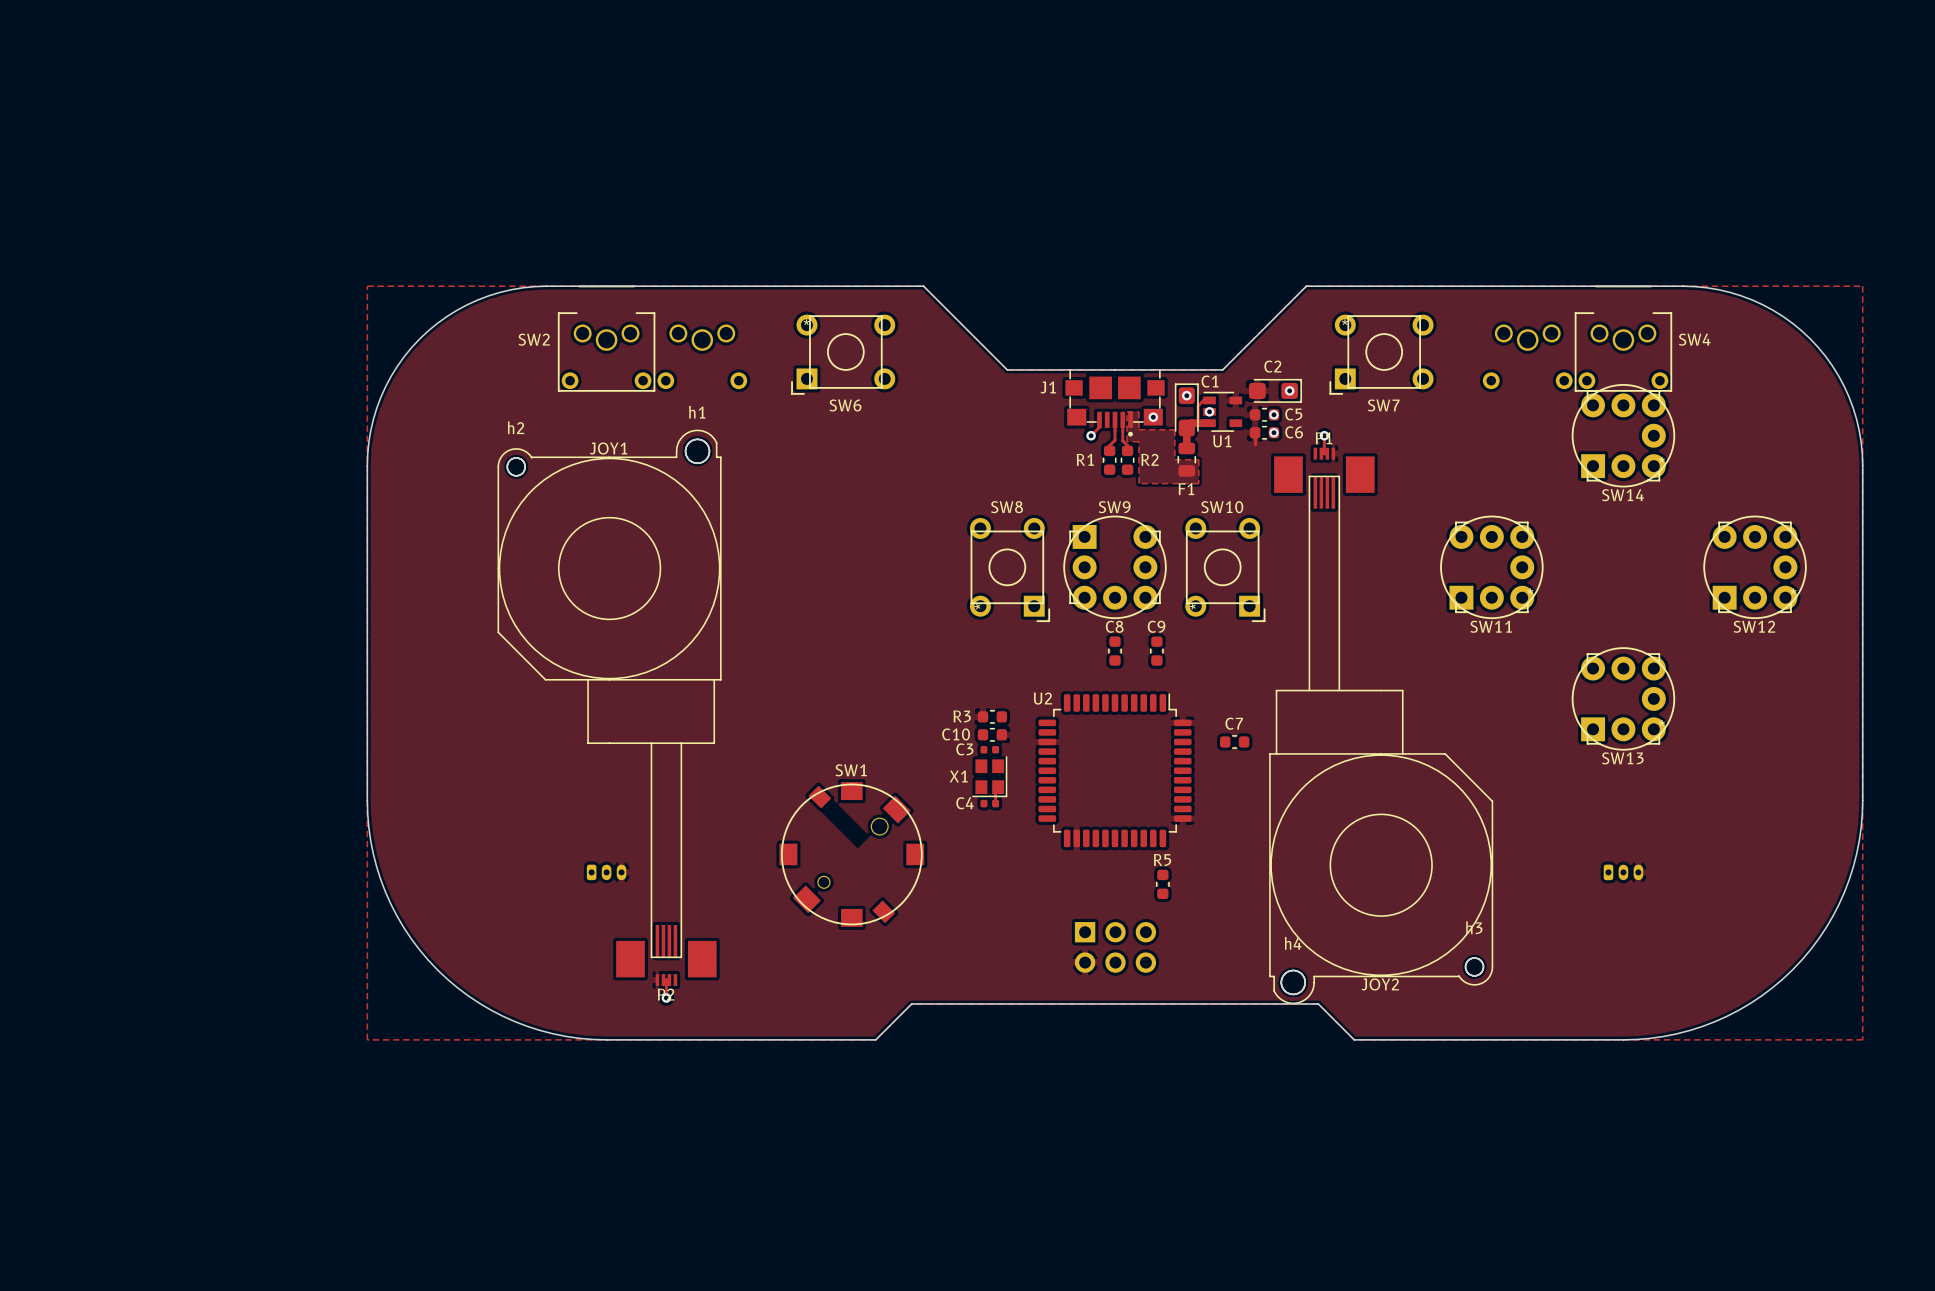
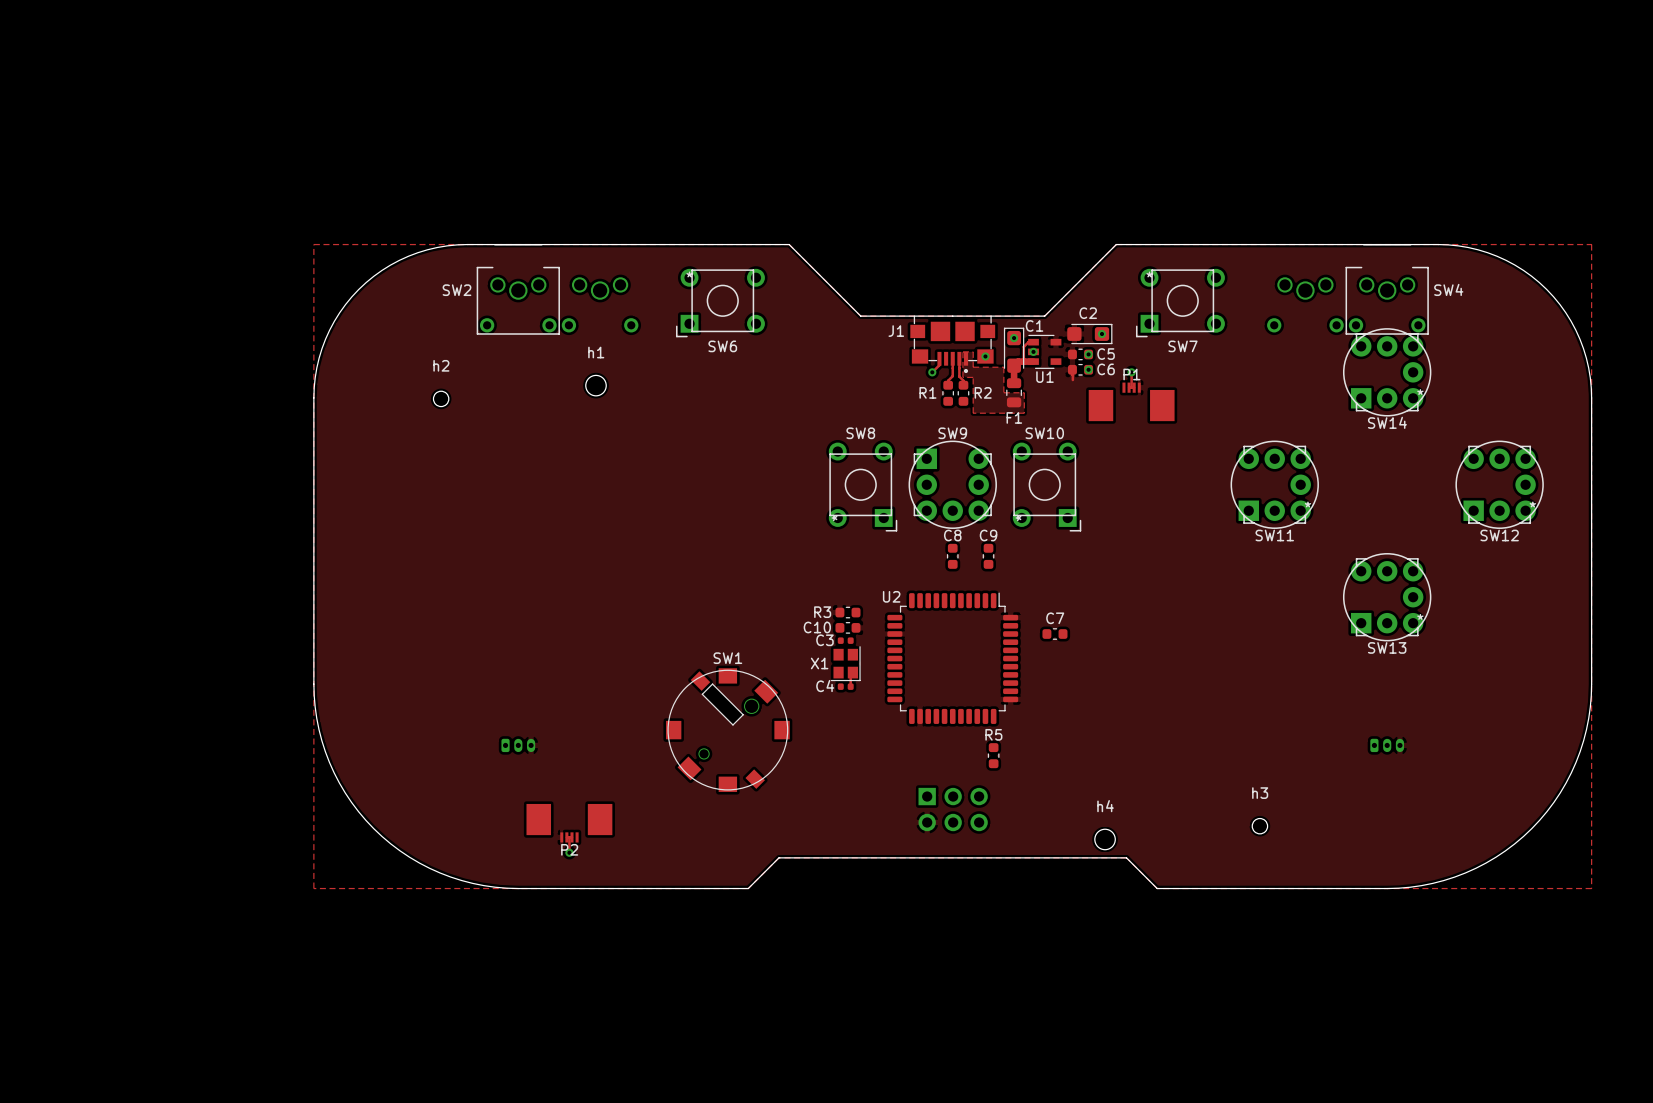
JOY1: (609, 693) -> none
JOY2: (1381, 739) -> none
SW1 footprint: [779, 782, 925, 927] -> [666, 668, 790, 792]

